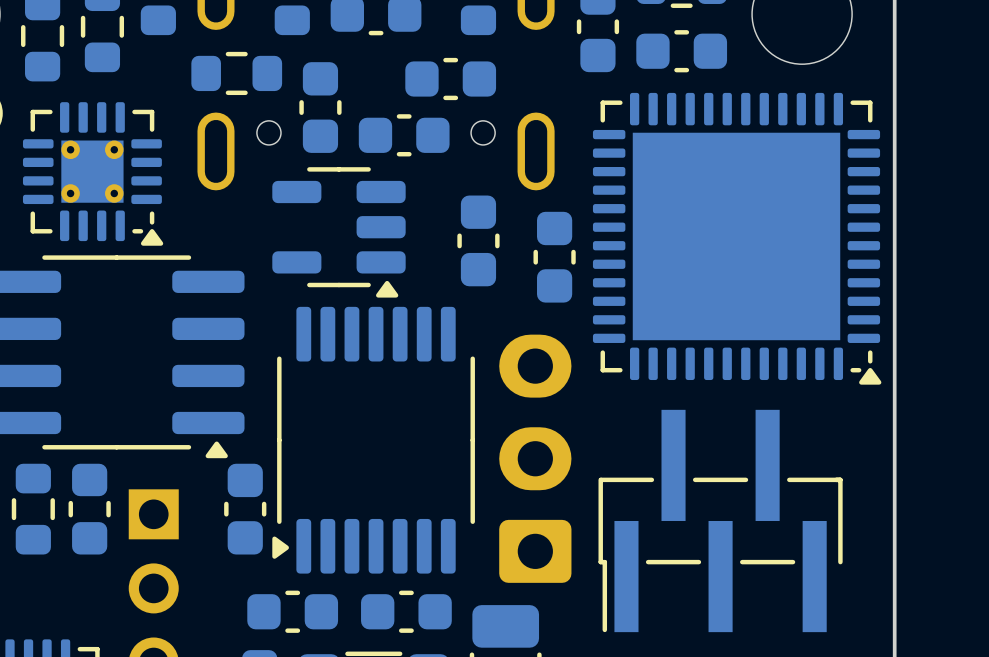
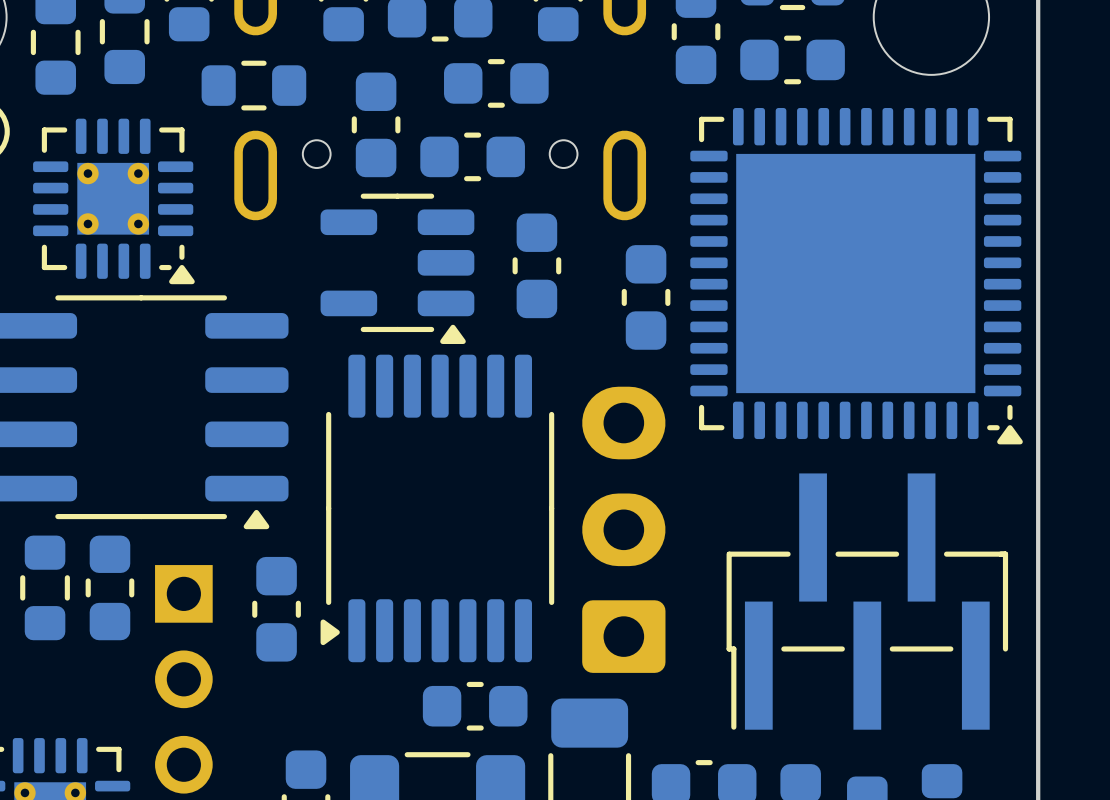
part position: (236, 73) -> (253, 85)
part position: (450, 79) -> (496, 83)
part position: (478, 240) -> (536, 265)
part position: (245, 509) -> (276, 609)
part position: (720, 520) -> (867, 601)
part: (292, 611) -> none

